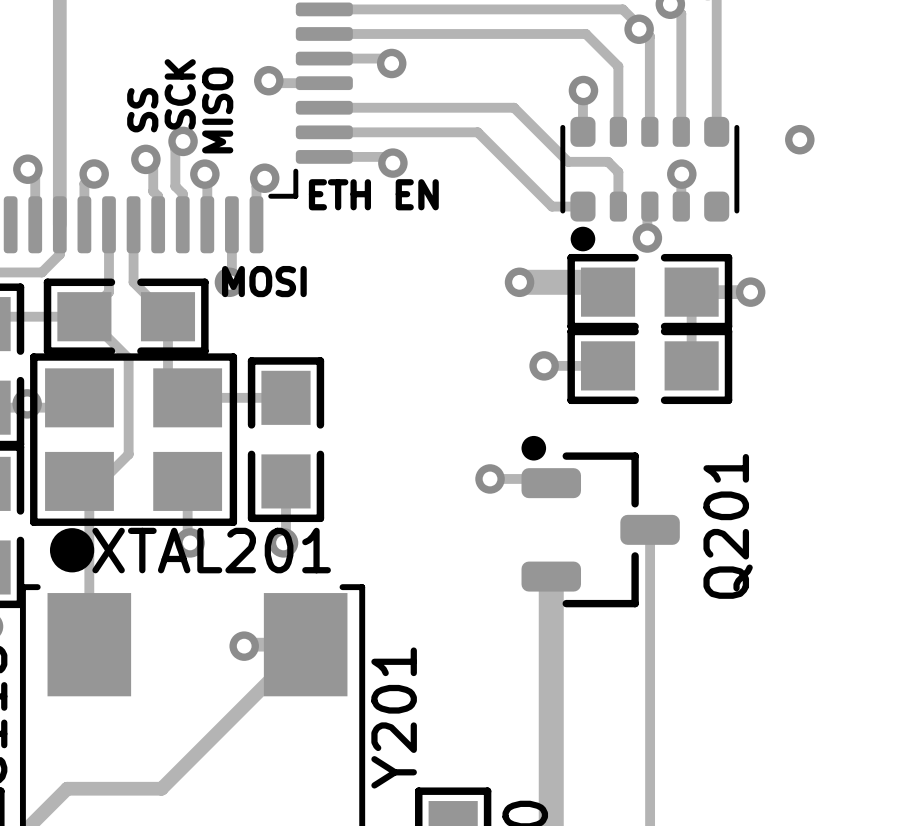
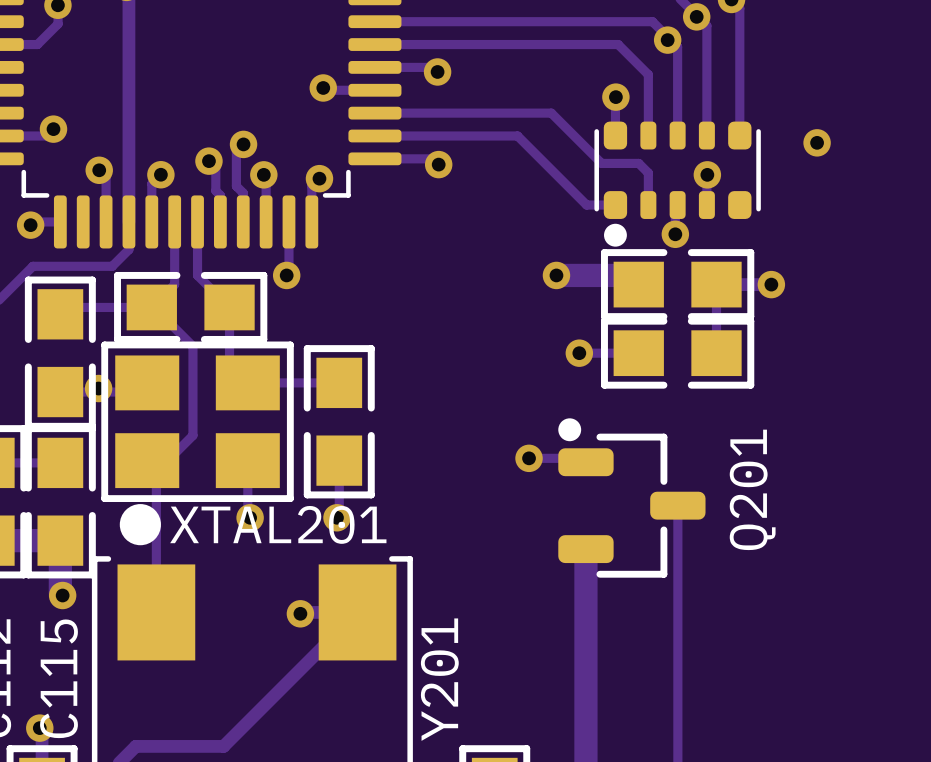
text: SCK (180, 94) -> none
text: SS (142, 110) -> none
text: MISO (217, 110) -> none
text: ETH EN (373, 194) -> none
text: MOSI (264, 281) -> none

